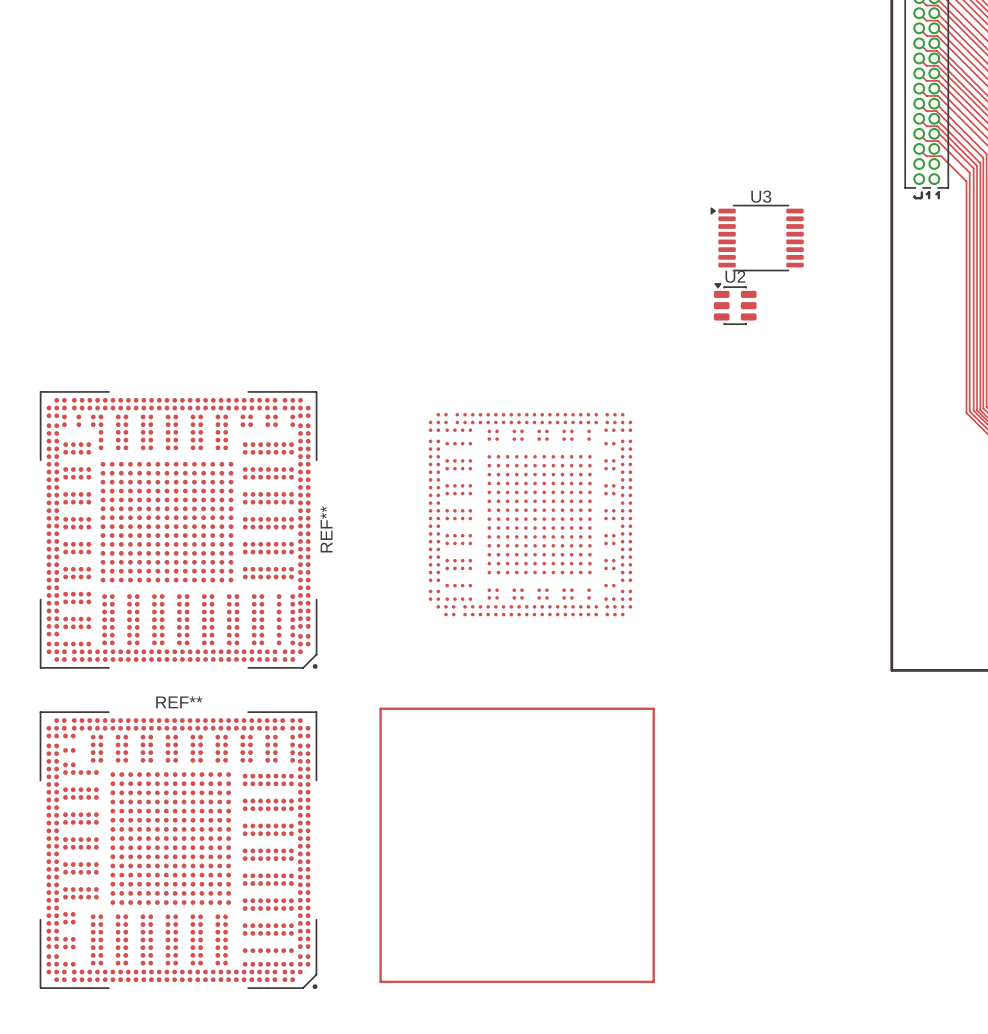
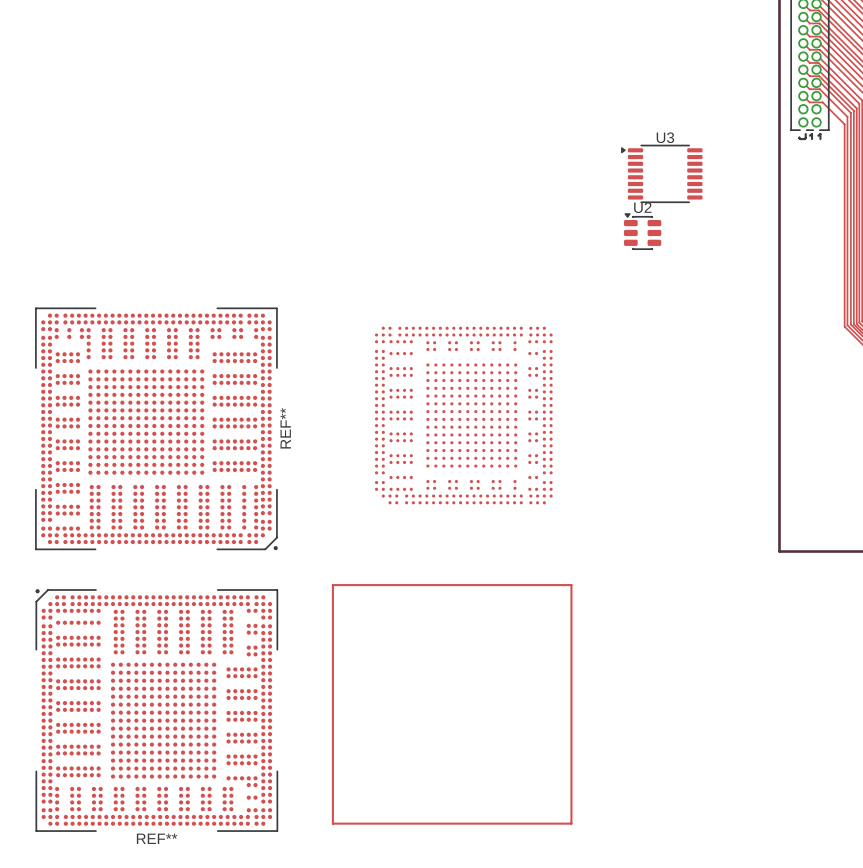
REF** rotation: 0° (178, 850) -> 180° (156, 710)

